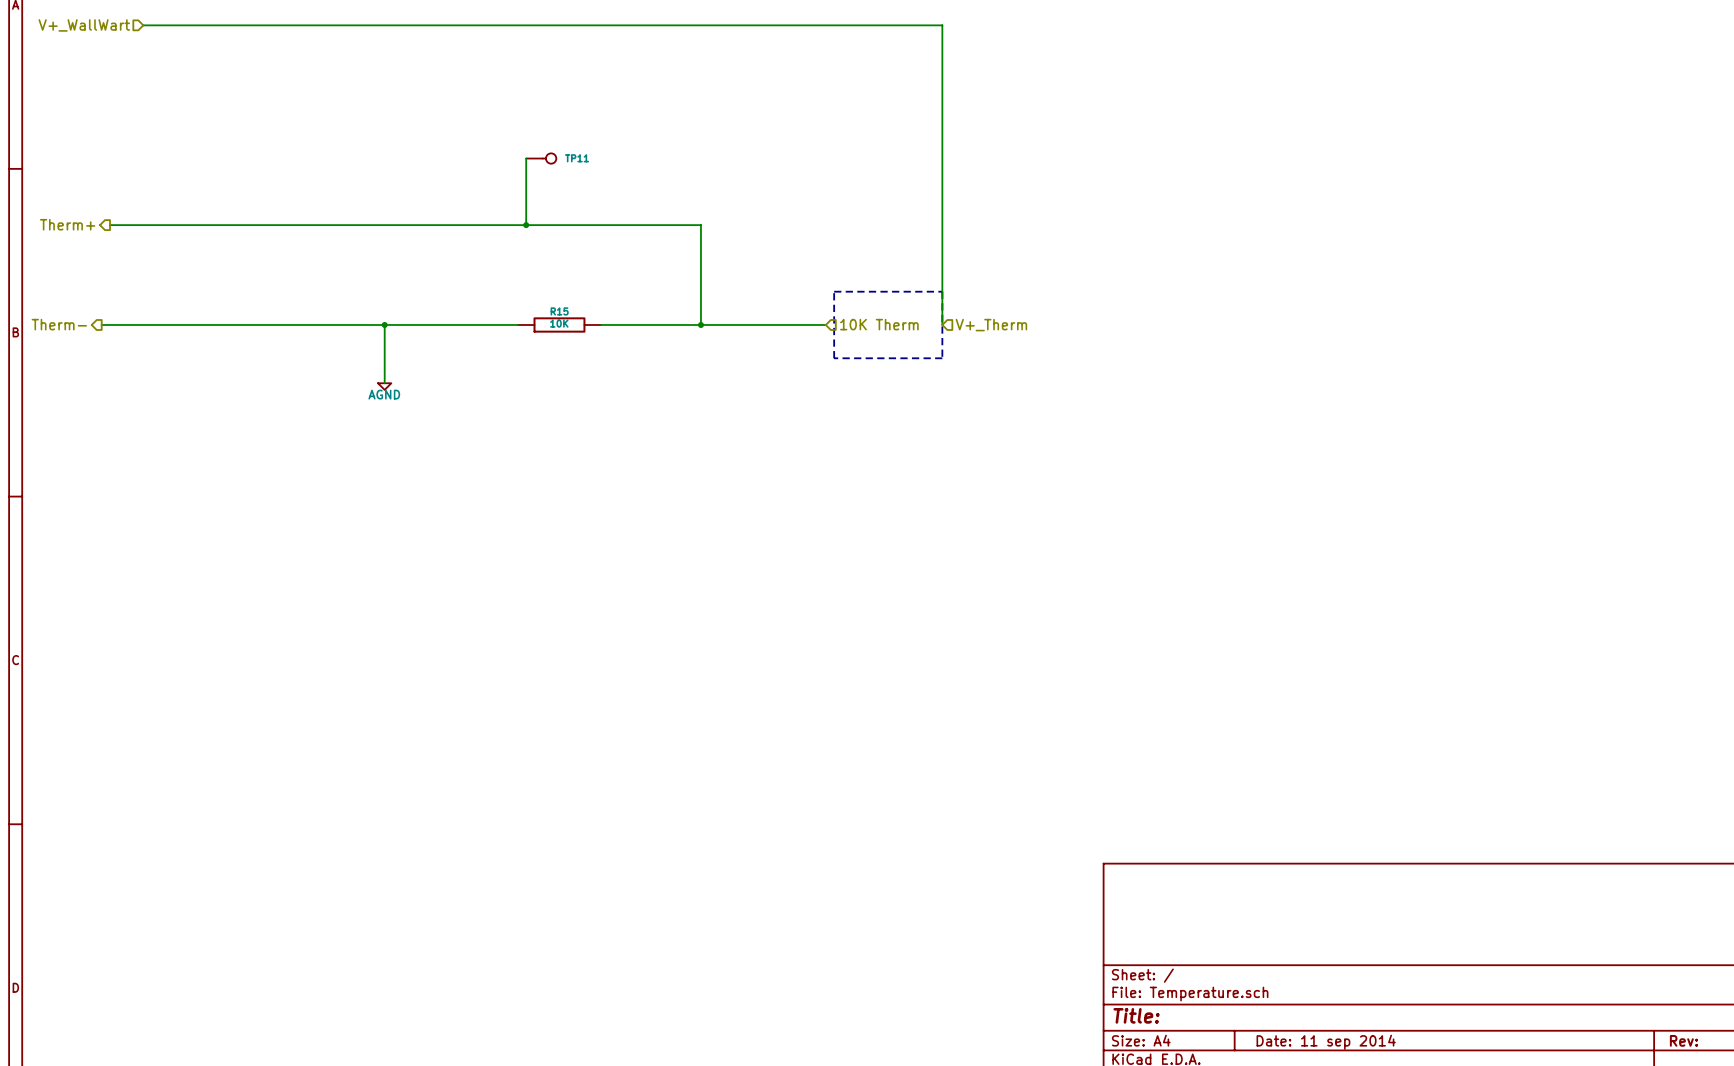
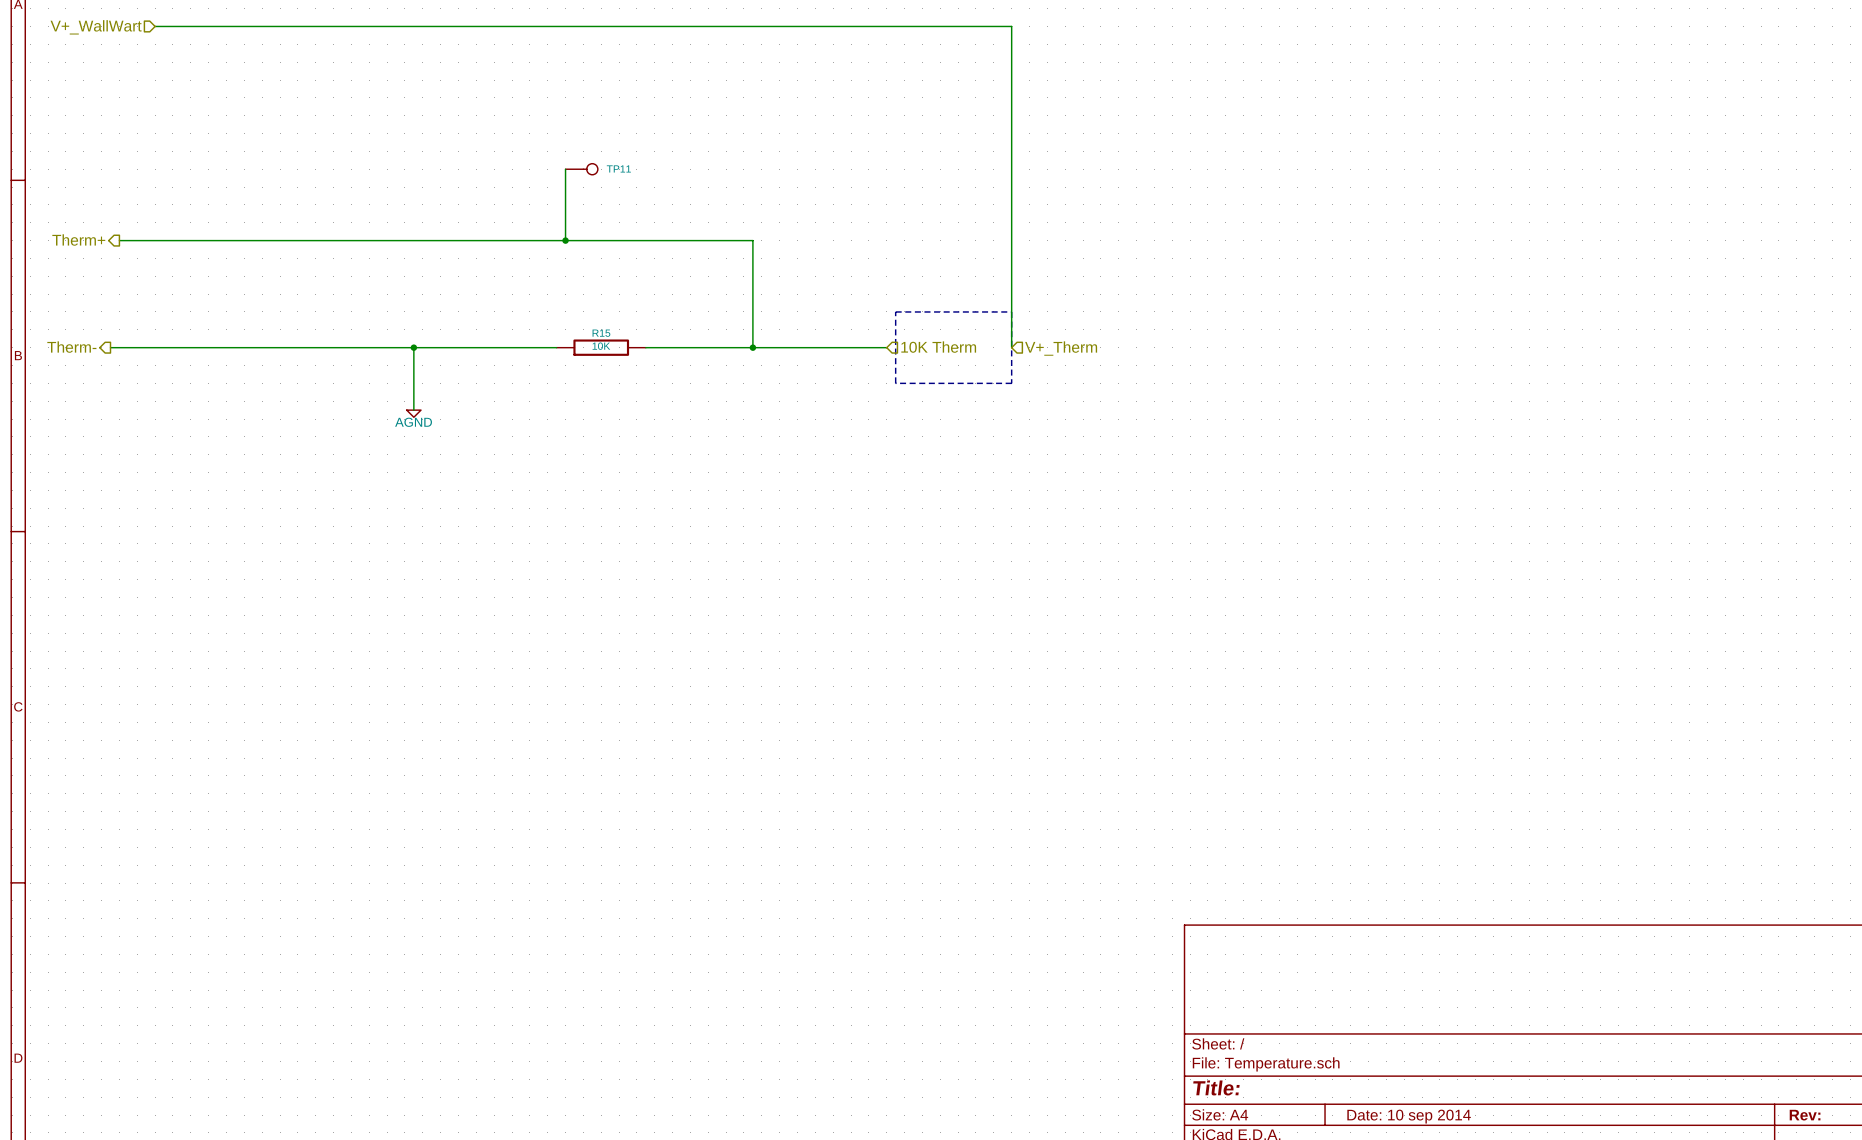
title block: Date: 11 sep 2014 (1326, 1042) -> Date: 10 sep 2014 (1409, 1116)

